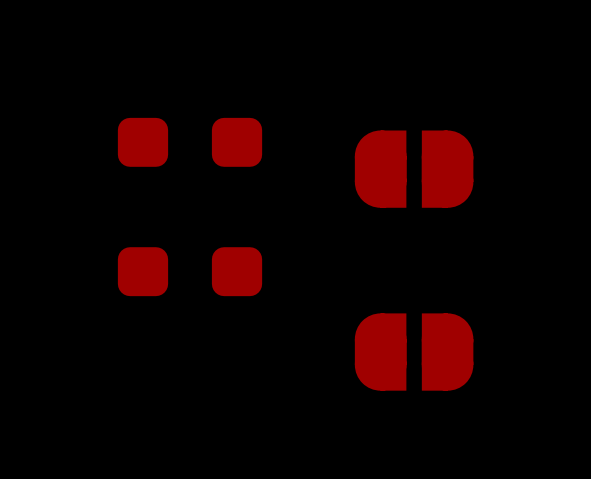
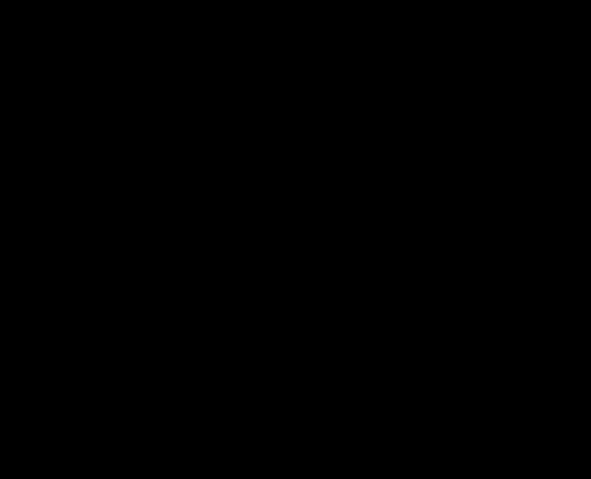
part: (190, 142) -> none
part: (414, 169) -> none
part: (190, 271) -> none
part: (414, 352) -> none

